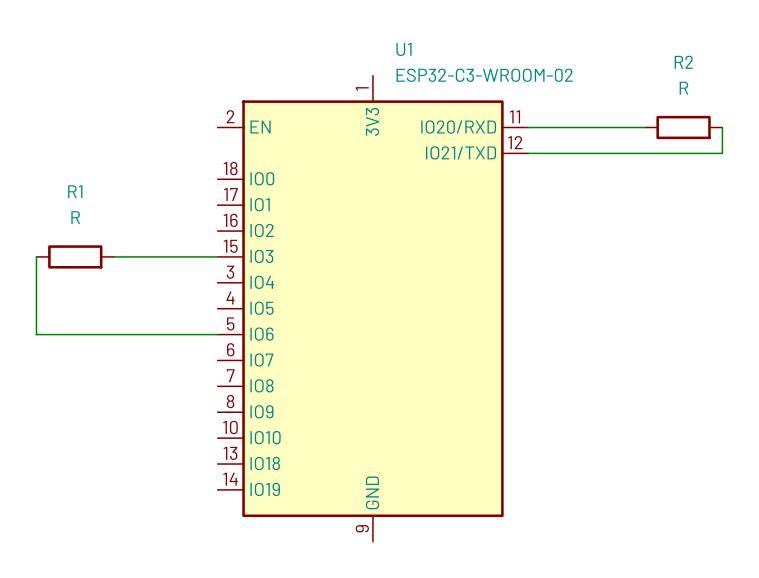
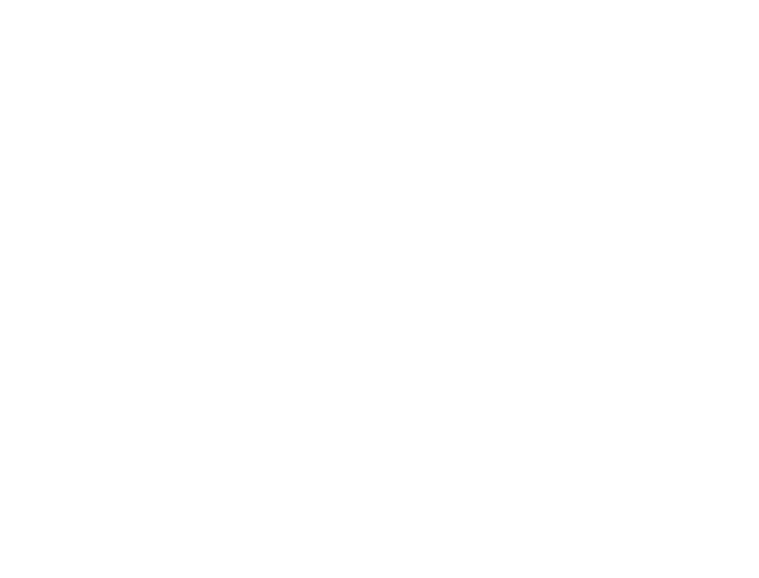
wire: (528, 127) (644, 127) -> none
R2: R (683, 127) -> none
wire: (722, 127) (722, 153) (528, 153) -> none
wire: (36, 256) (36, 334) (217, 334) -> none
R1: R (75, 256) -> none
wire: (114, 256) (217, 256) -> none
U1: ESP32-C3-WROOM-02 (372, 308) -> none

